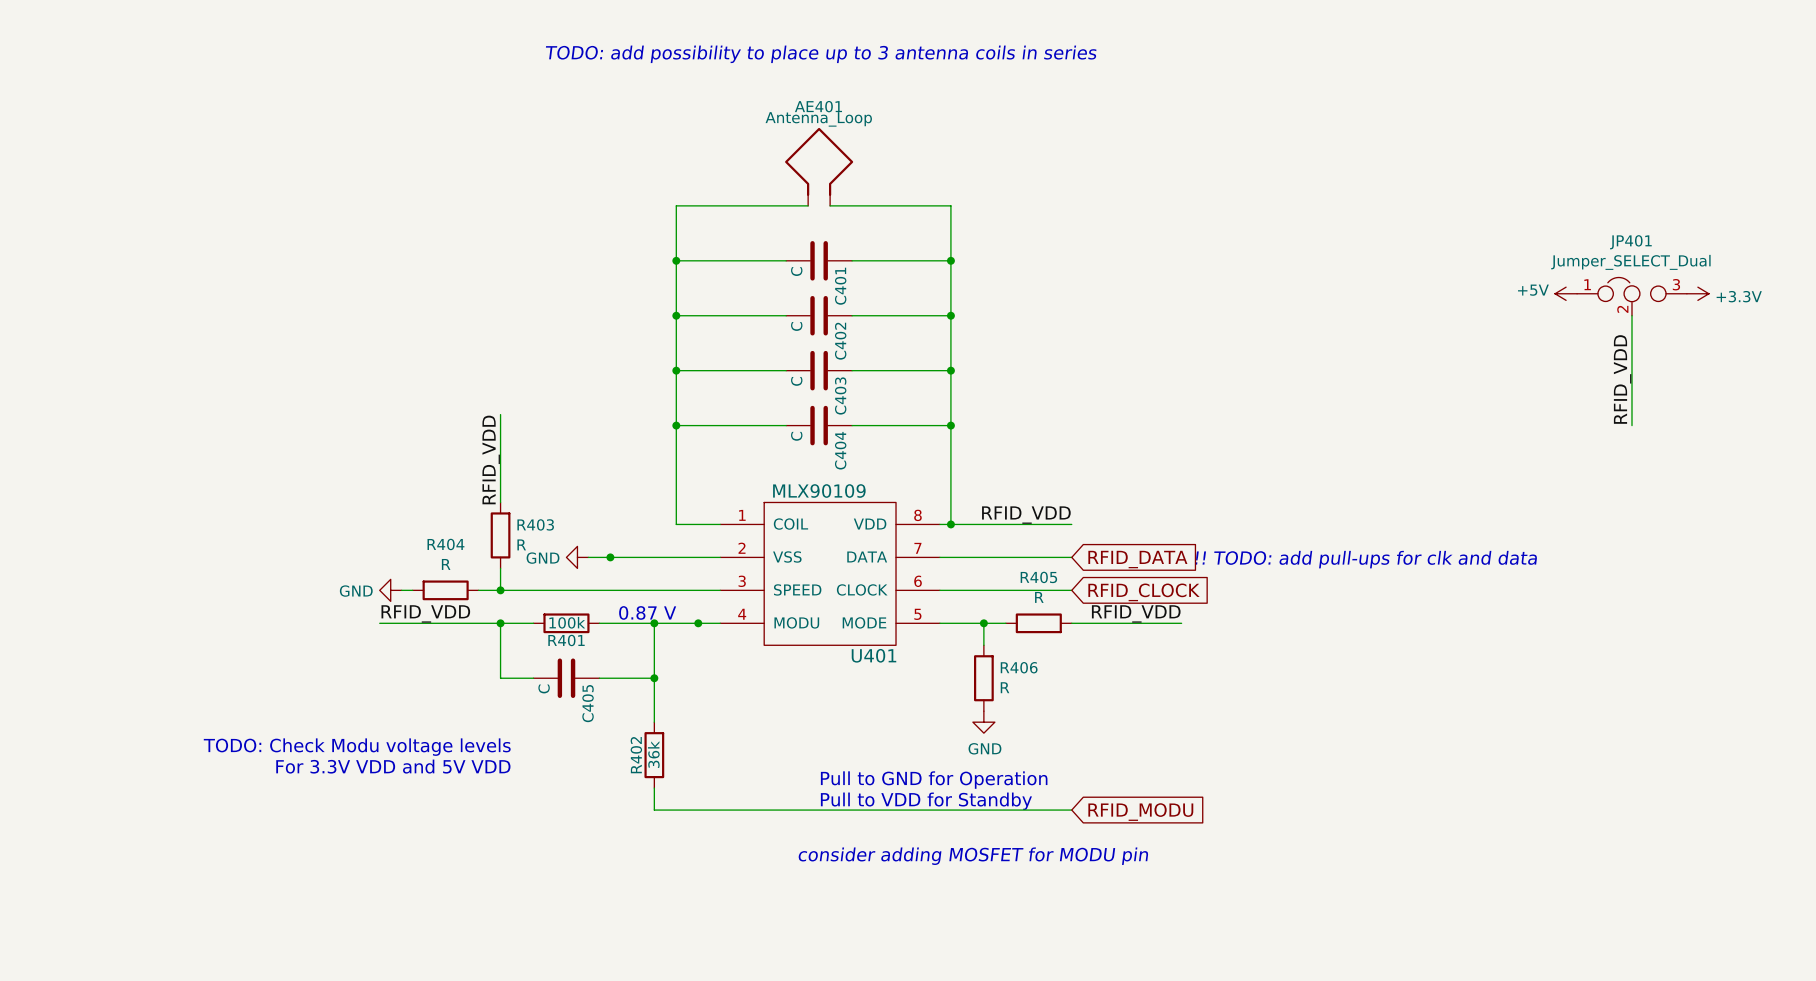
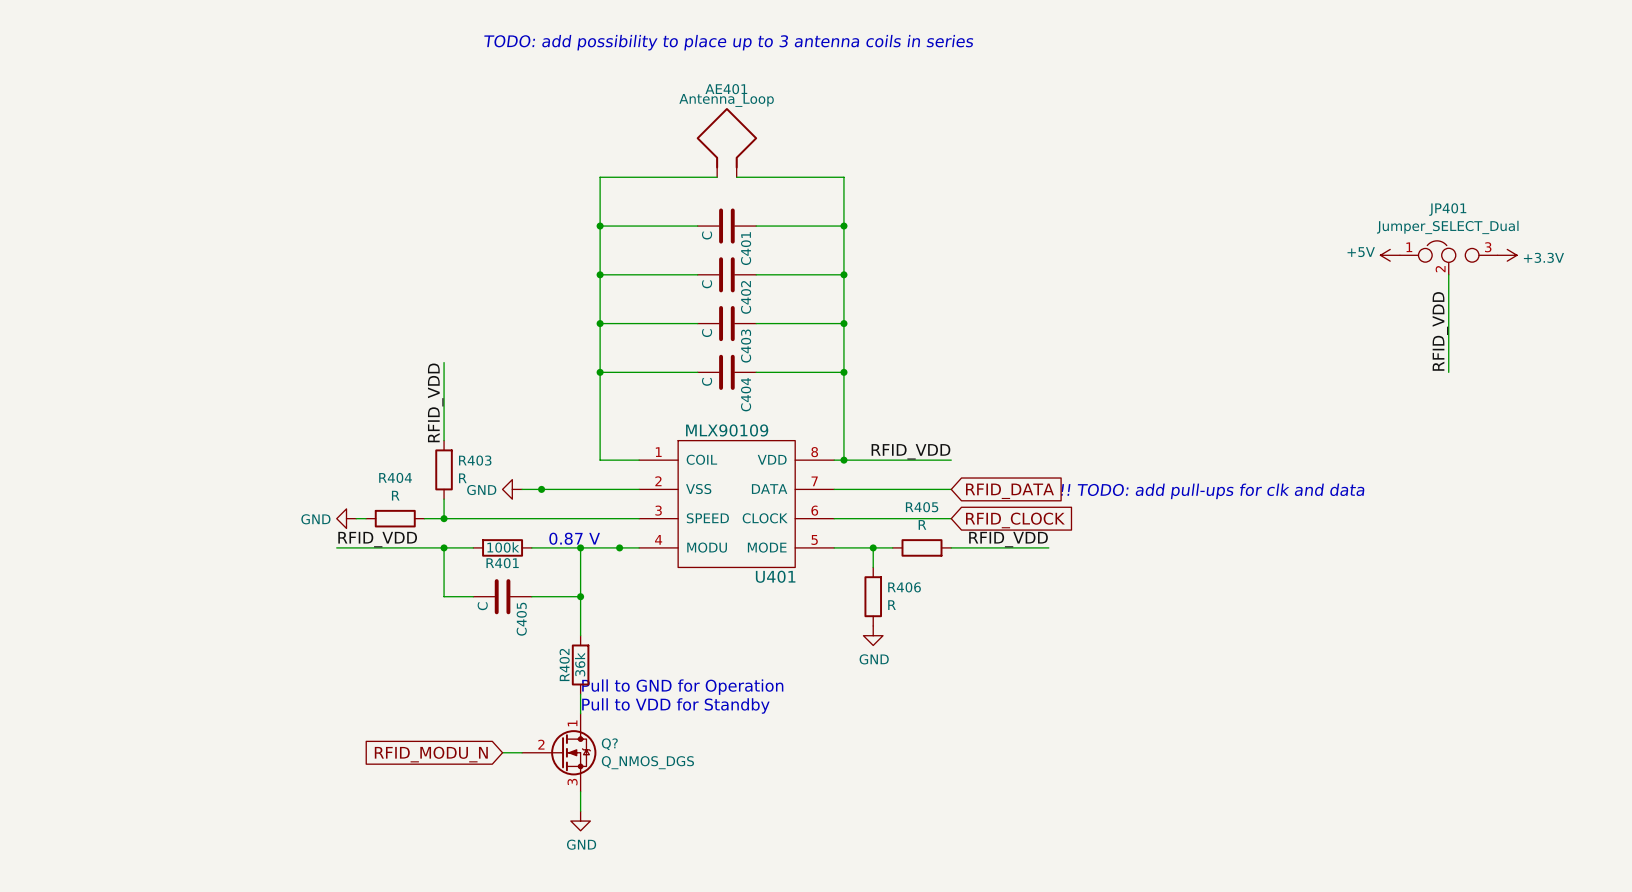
text: TODO: Check Modu voltage levels (357, 747) -> none
text: For 3.3V VDD and 5V VDD (393, 766) -> none
text position: Pull to GND for Operation (934, 780) -> Pull to GND for Operation (682, 687)
text position: Pull to VDD for Standby (926, 801) -> Pull to VDD for Standby (675, 705)
wire: (654, 810) (1071, 810) -> none
global label: RFID_MODU (1140, 812) -> none
wire: none -> (502, 752) (522, 752)
Q?: none -> Q_NMOS_DGS (559, 752)
global label: none -> RFID_MODU_N (431, 754)
text: consider adding MOSFET for MODU pin (973, 856) -> none
wire: none -> (580, 791) (580, 811)
power symbol: none -> GND (580, 821)

